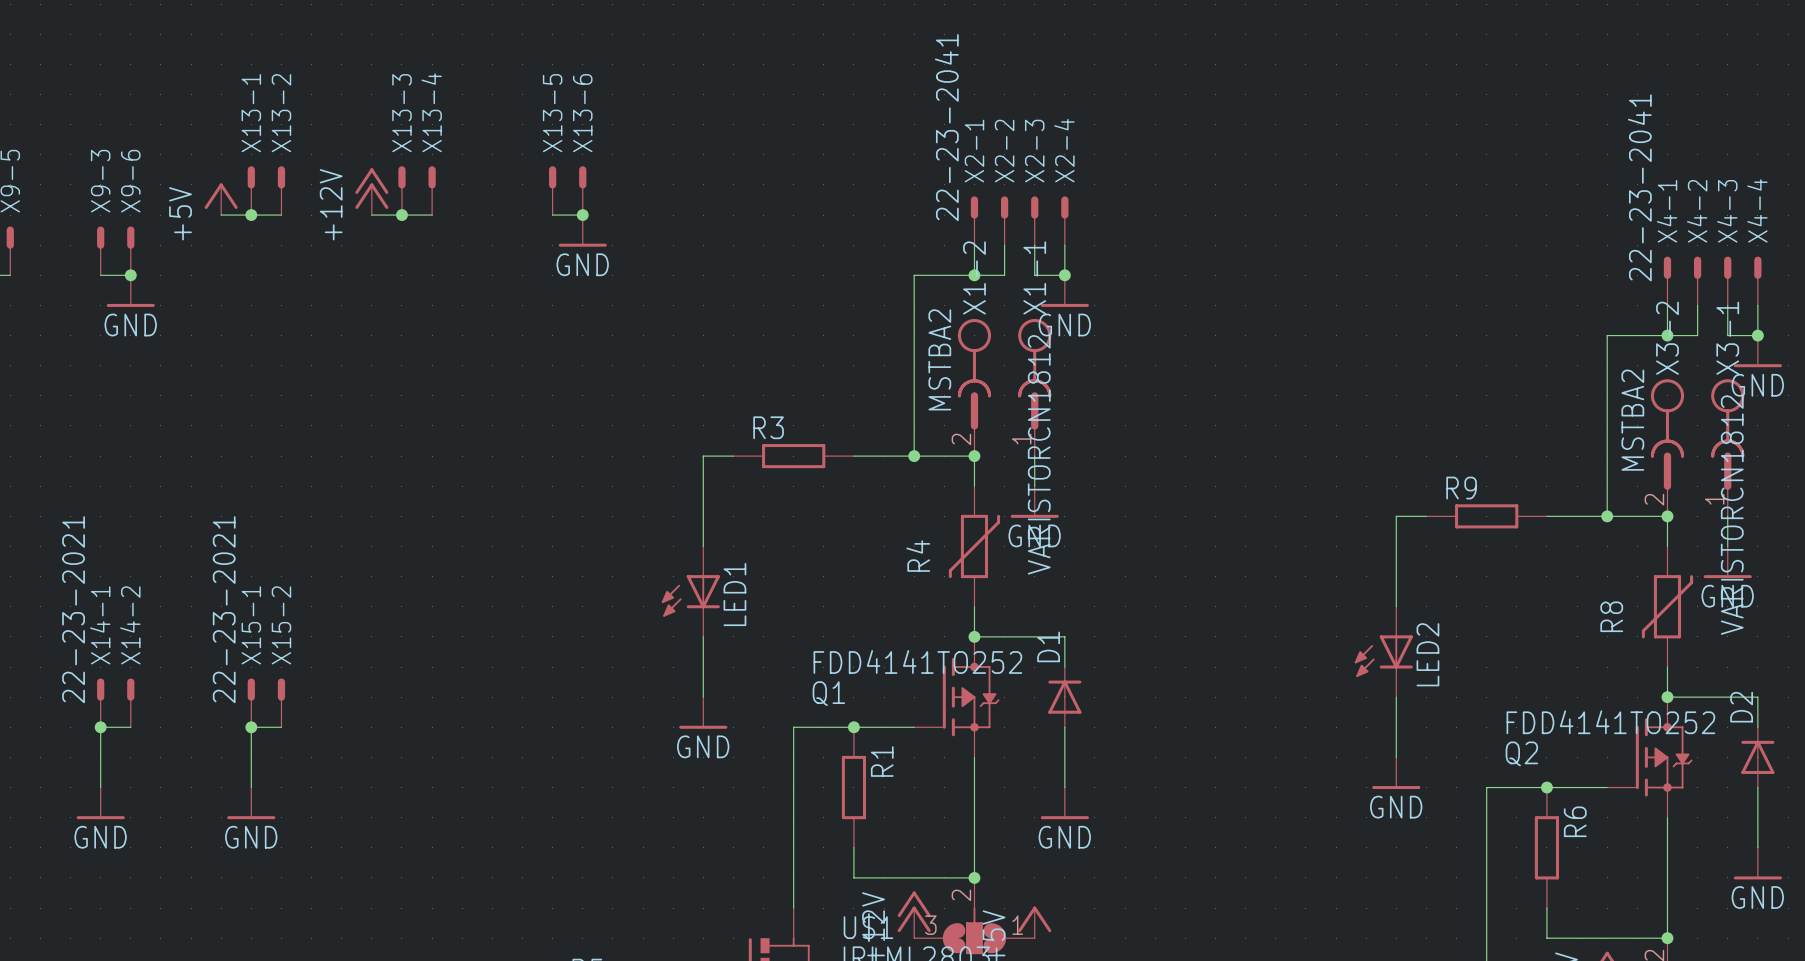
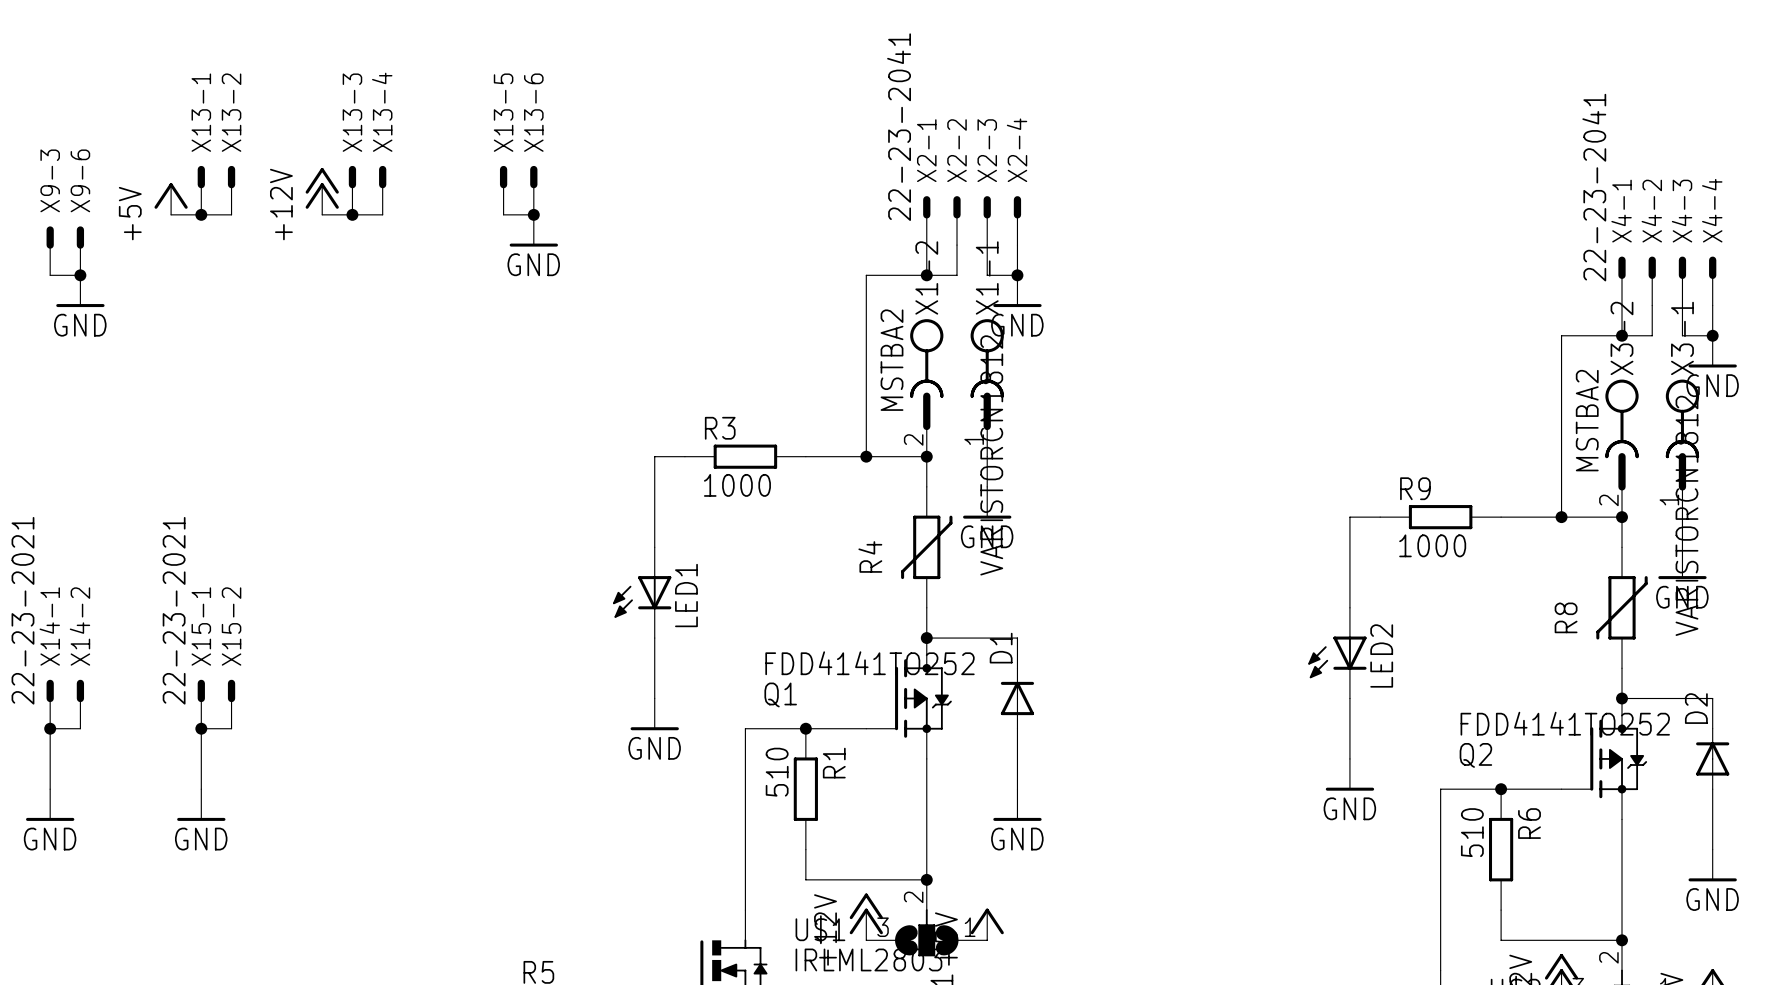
R3 value: none -> 1000 (737, 485)
R9 value: none -> 1000 (1432, 545)
R1 value: none -> 510 (777, 772)
R6 value: none -> 510 (1472, 832)

